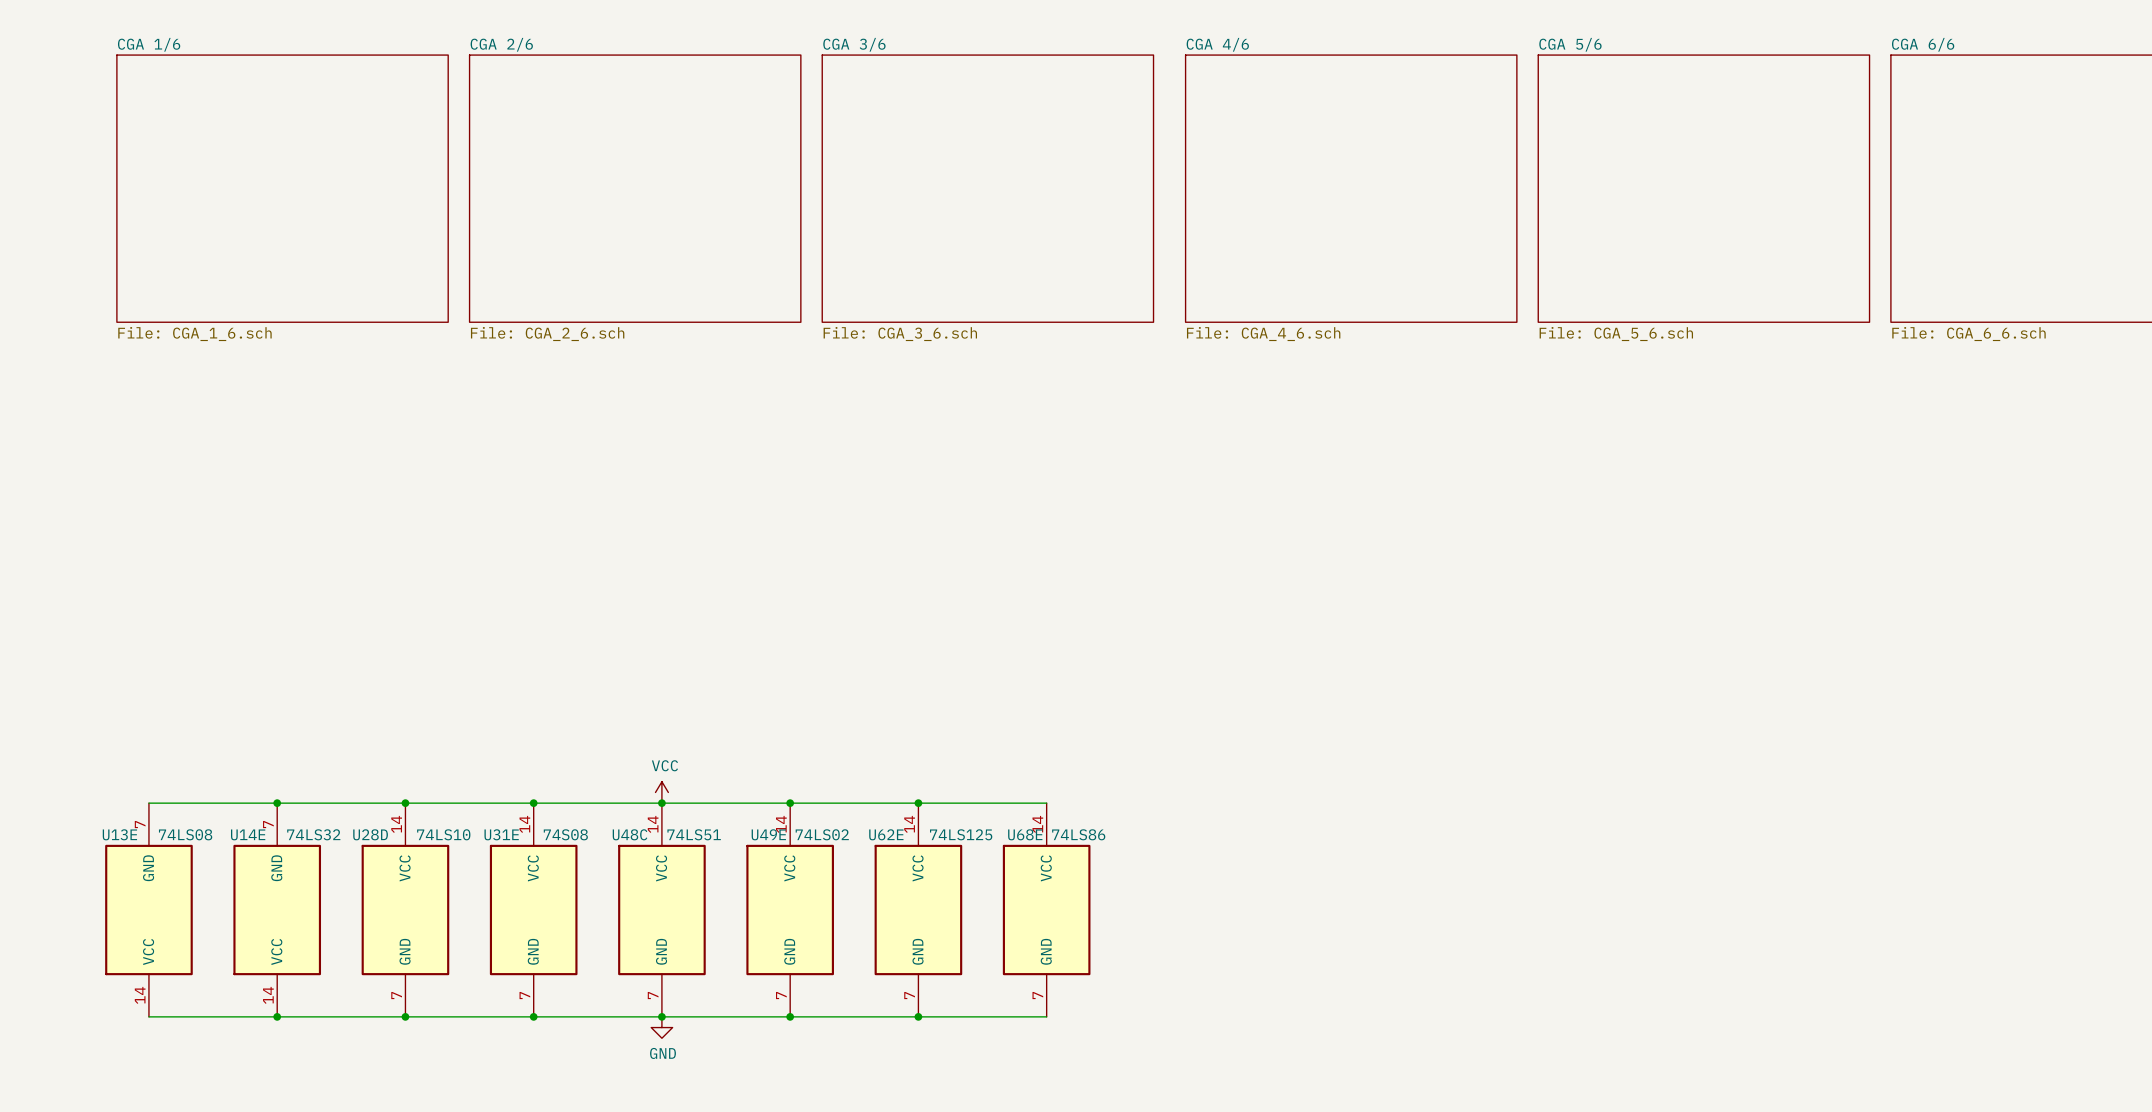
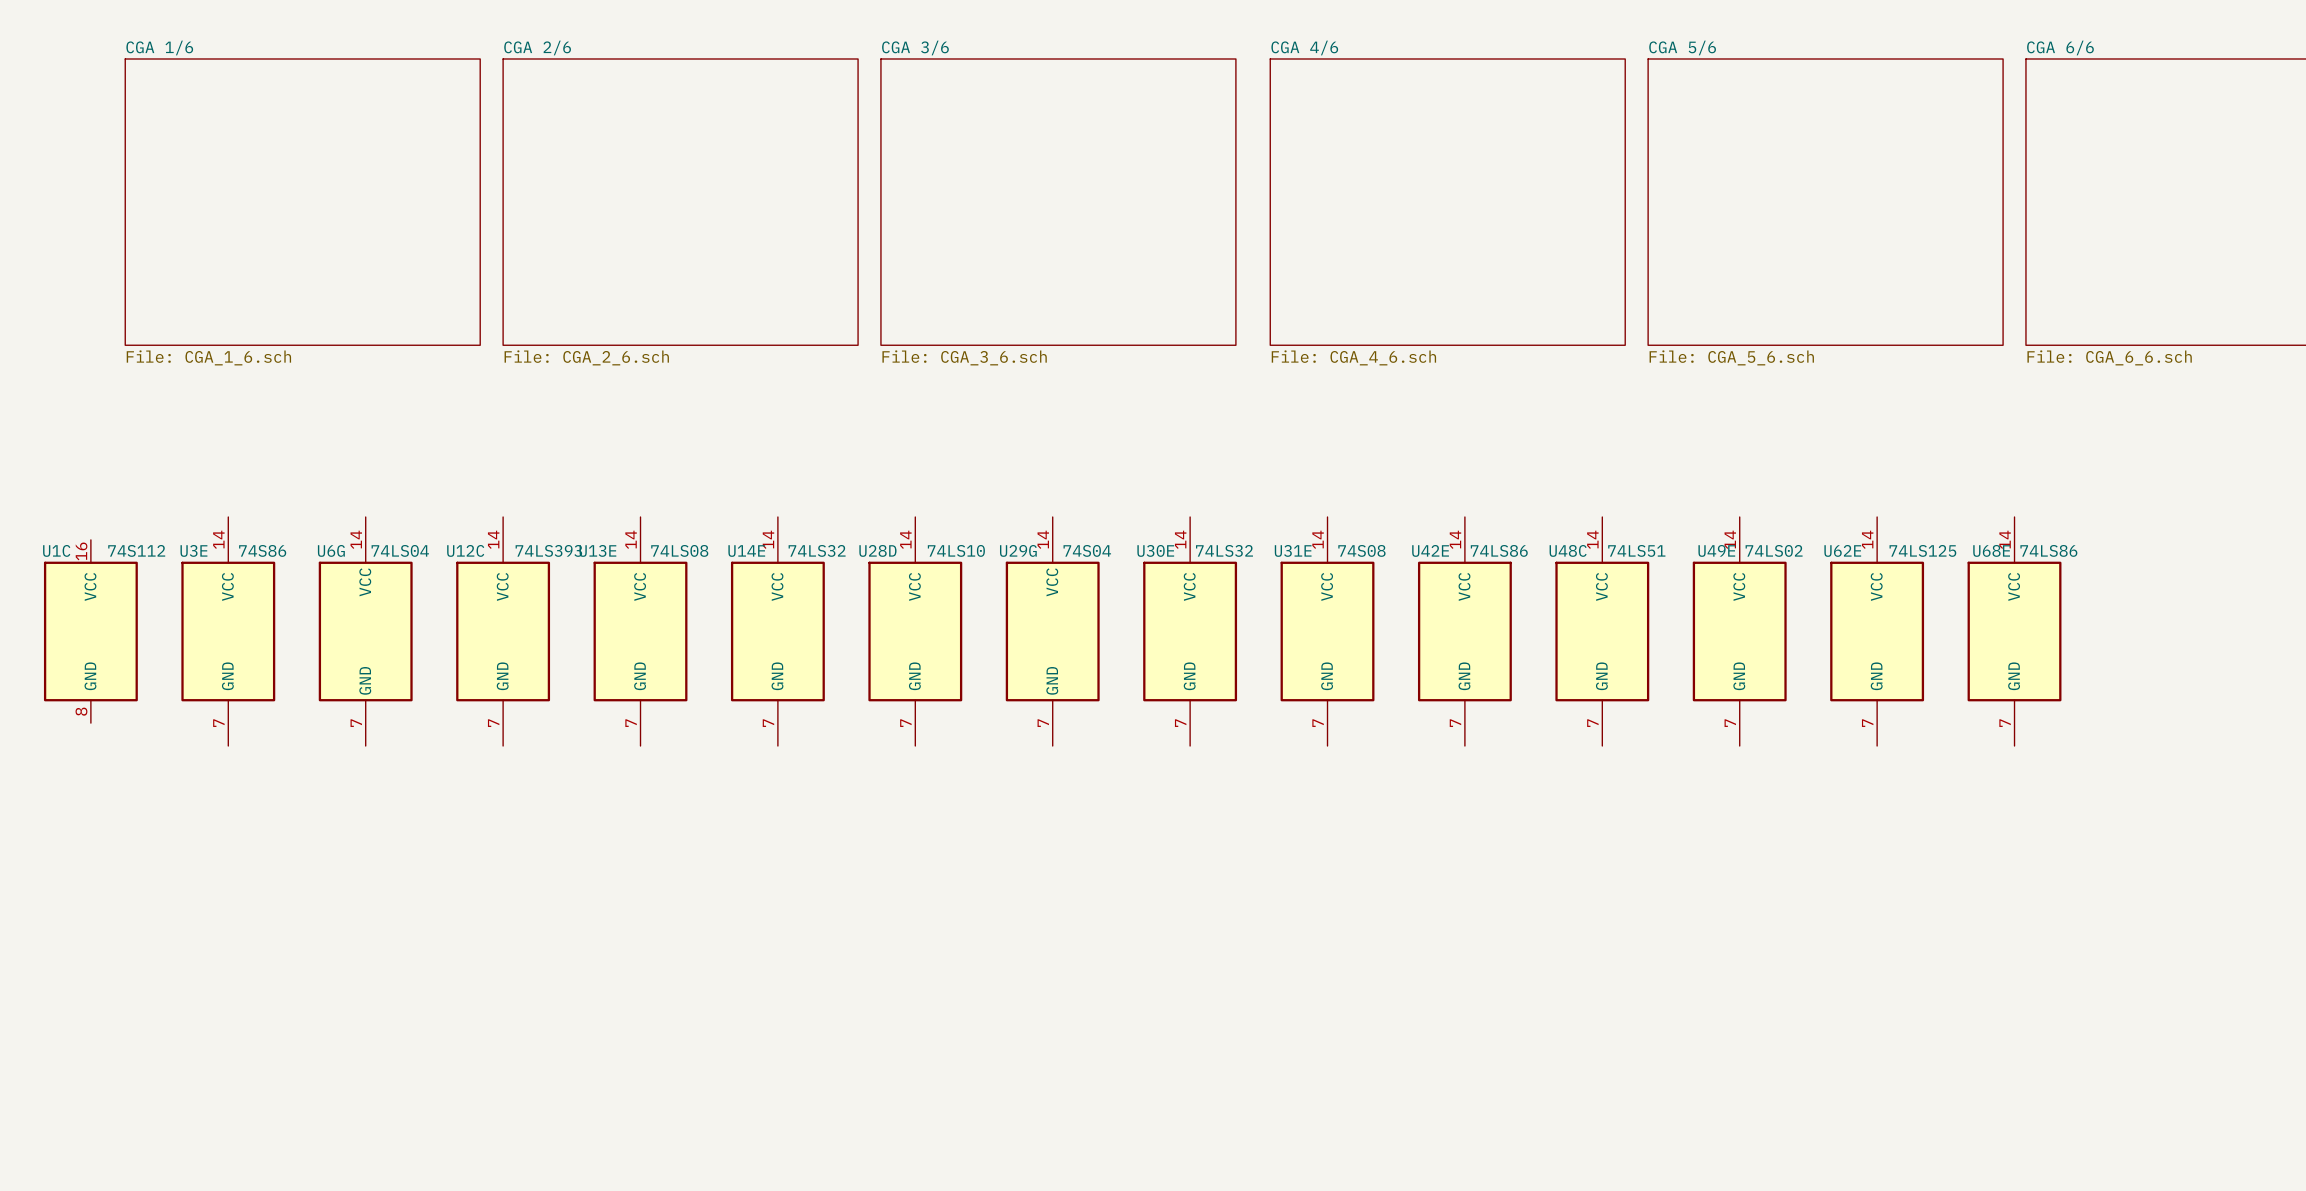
U1C: none -> 74S112 (90, 631)
U3E: none -> 74S86 (228, 631)
U6G: none -> 74LS04 (365, 631)
U12C: none -> 74LS393 (503, 631)
U29G: none -> 74S04 (1052, 631)
U30E: none -> 74LS32 (1190, 631)
U42E: none -> 74LS86 (1464, 631)
power symbol: VCC (661, 792) -> none
wire: (148, 803) (1046, 803) -> none
junction: (277, 803) -> none
junction: (405, 803) -> none
junction: (533, 803) -> none
junction: (661, 803) -> none
junction: (790, 803) -> none
junction: (918, 803) -> none
U13E rotation: 0° (148, 910) -> 180° (640, 631)
U13E position: (148, 910) -> (640, 631)
U14E rotation: 0° (277, 910) -> 180° (777, 631)
U14E position: (277, 910) -> (777, 631)
U28D position: (405, 910) -> (915, 631)
U31E position: (533, 910) -> (1327, 631)
U48C position: (661, 910) -> (1602, 631)
U49E position: (790, 910) -> (1739, 631)
U62E position: (918, 910) -> (1877, 631)
U68E position: (1046, 910) -> (2014, 631)
wire: (148, 1016) (1046, 1016) -> none
junction: (277, 1016) -> none
junction: (405, 1016) -> none
junction: (533, 1016) -> none
junction: (661, 1016) -> none
junction: (790, 1016) -> none
junction: (918, 1016) -> none
power symbol: GND (661, 1027) -> none

